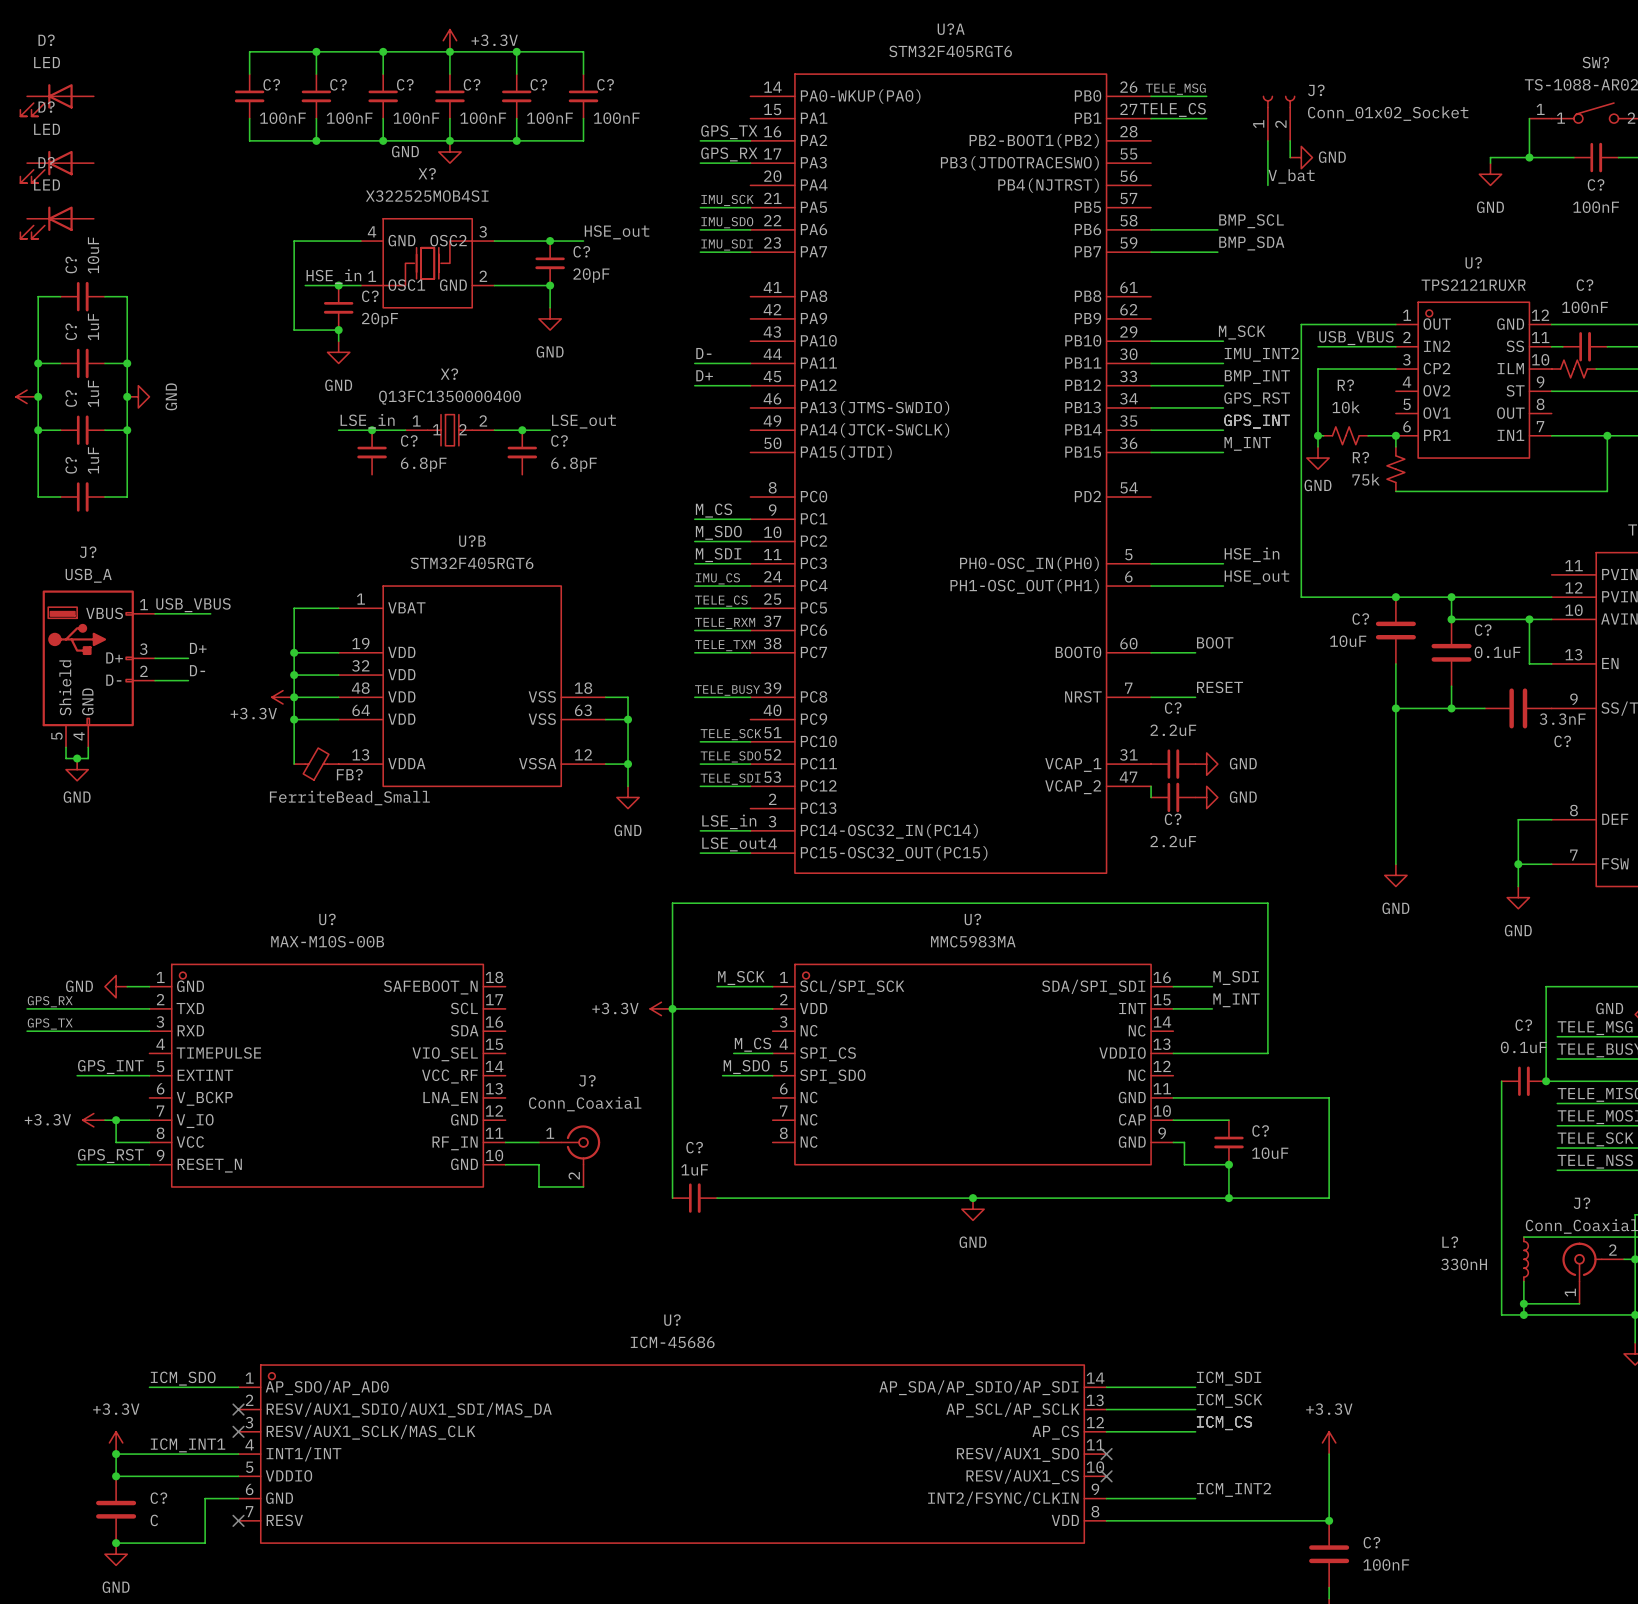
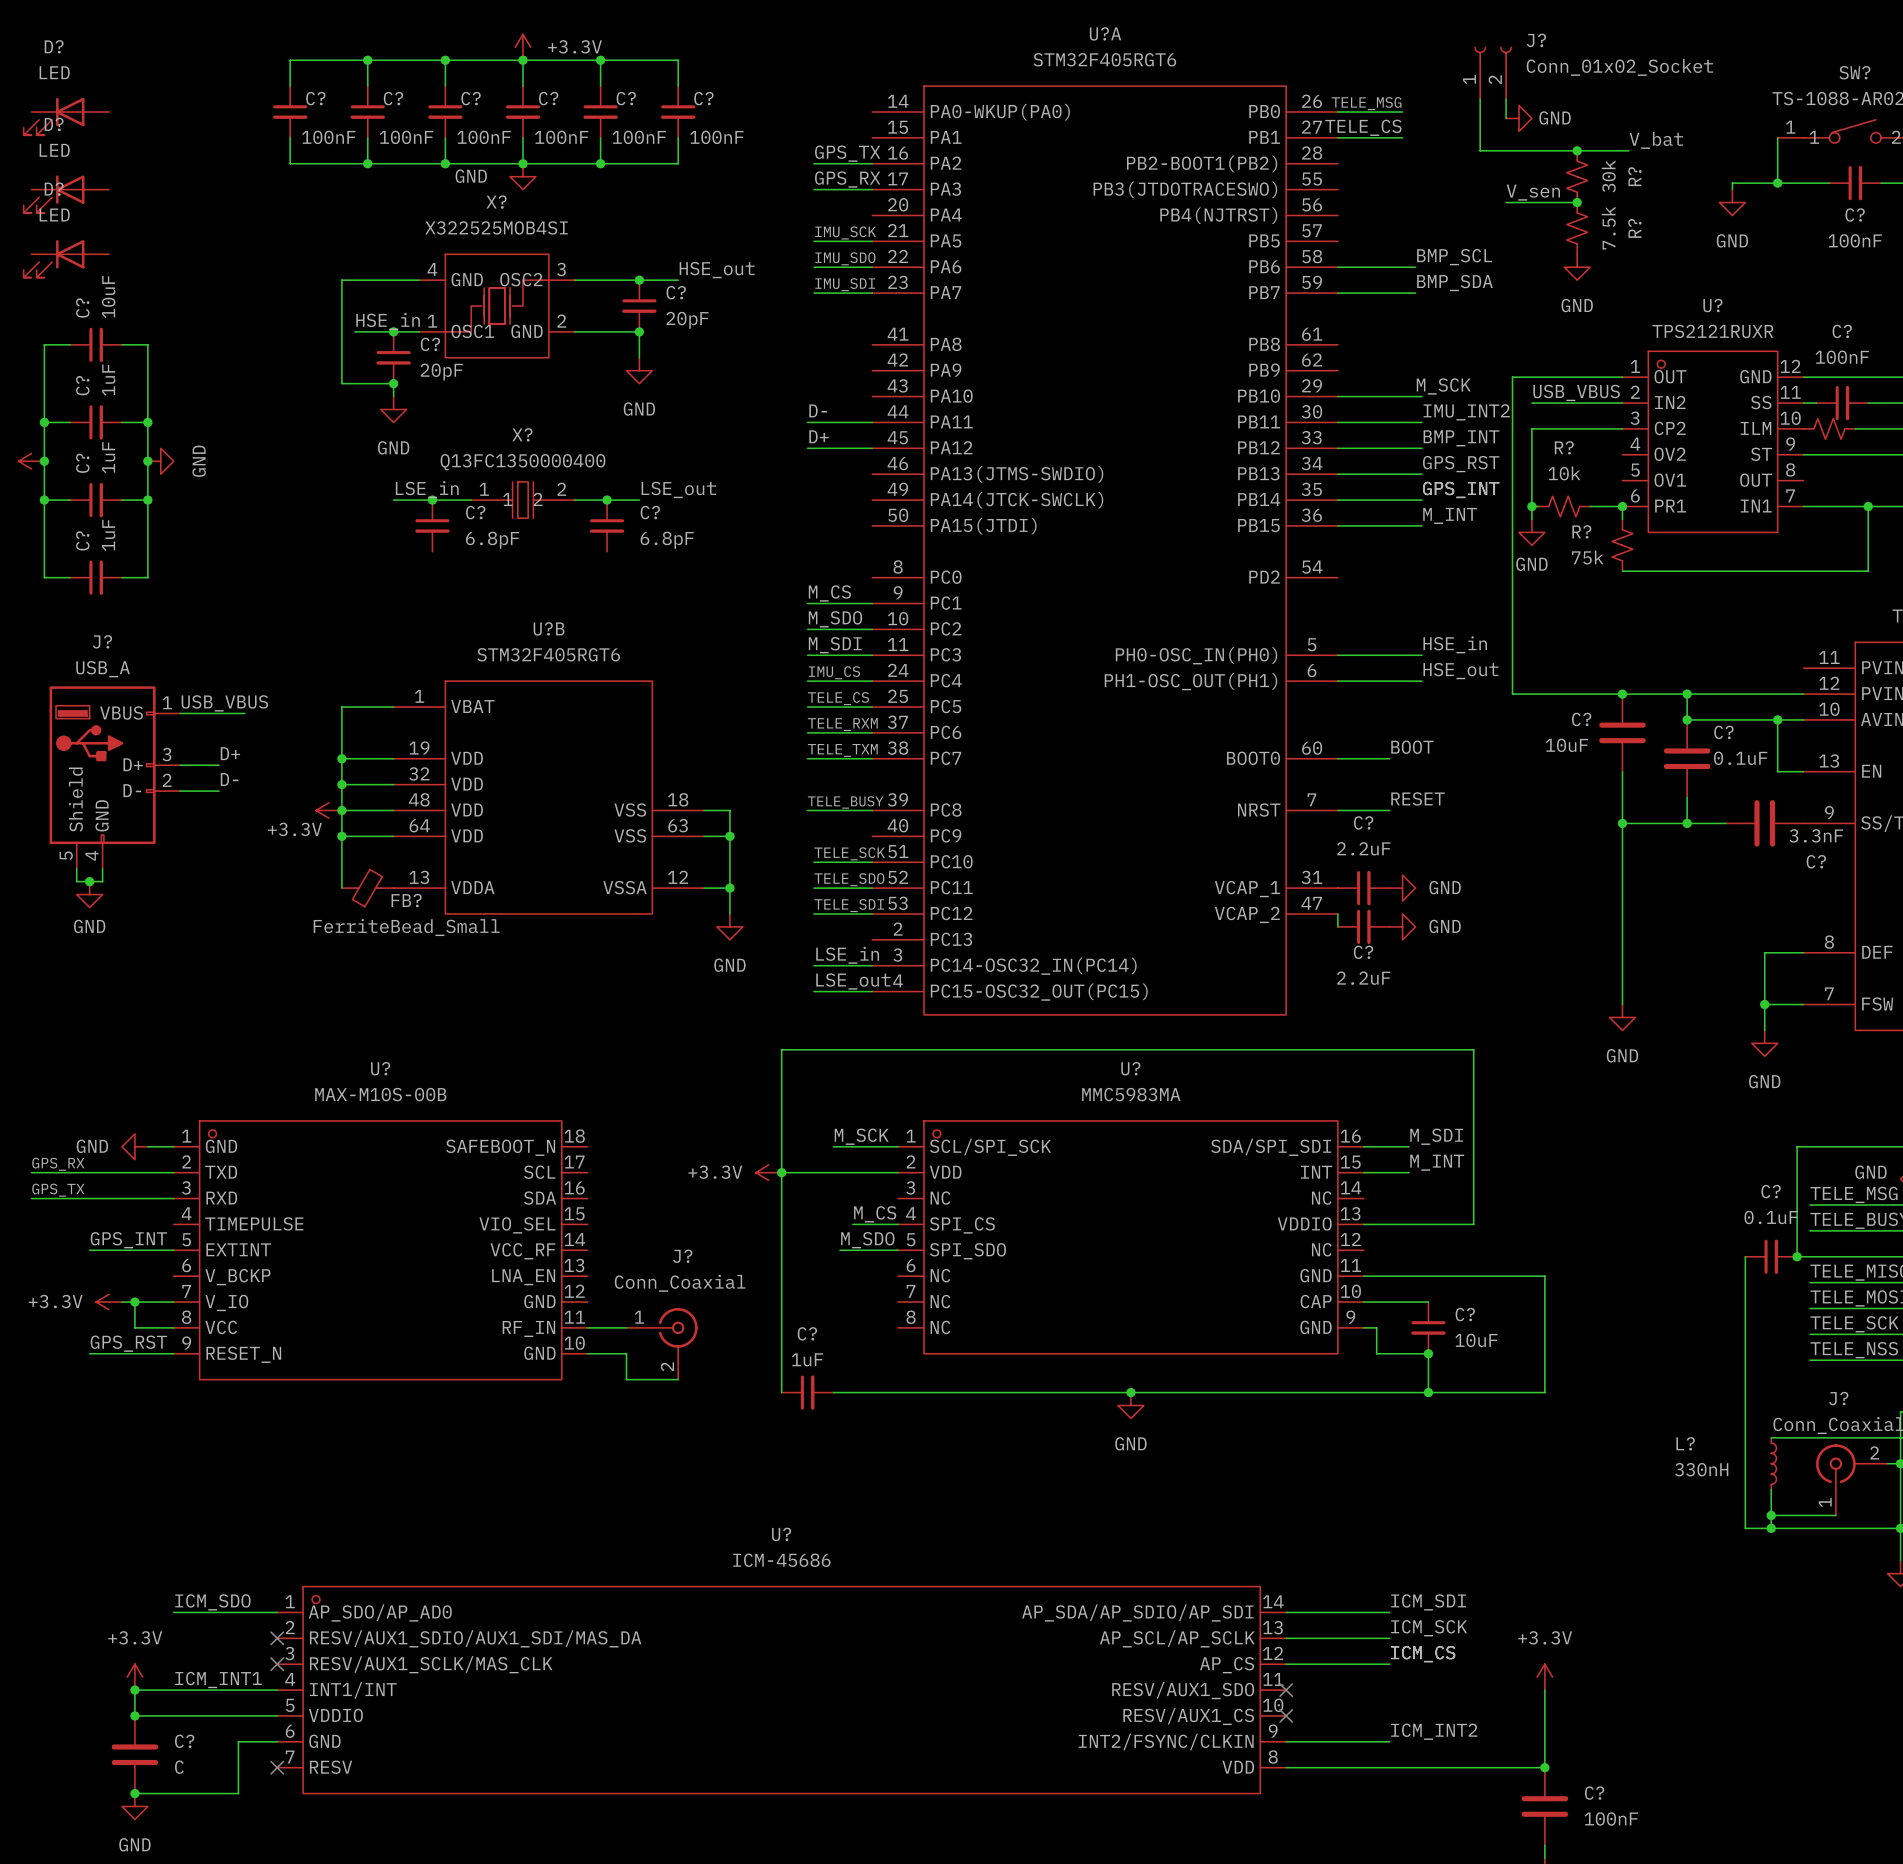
wire: none -> (1480, 99) (1480, 150) (1628, 150)
power symbol: none -> GND (1518, 118)
J? position: (1279, 118) -> (1493, 72)
junction: none -> (1577, 150)
wire: (1267, 140) (1267, 185) -> none
wire: (1290, 140) (1290, 157) -> (1506, 99) (1506, 118)
R?: none -> 30k (1577, 176)
power symbol: GND (1301, 157) -> none
label: none -> V_sen (1533, 192)
wire: none -> (1506, 202) (1577, 202)
junction: none -> (1577, 202)
label position: V_bat (1291, 176) -> V_bat (1656, 140)
R?: none -> 7.5k (1577, 228)
power symbol: none -> GND (1577, 267)

